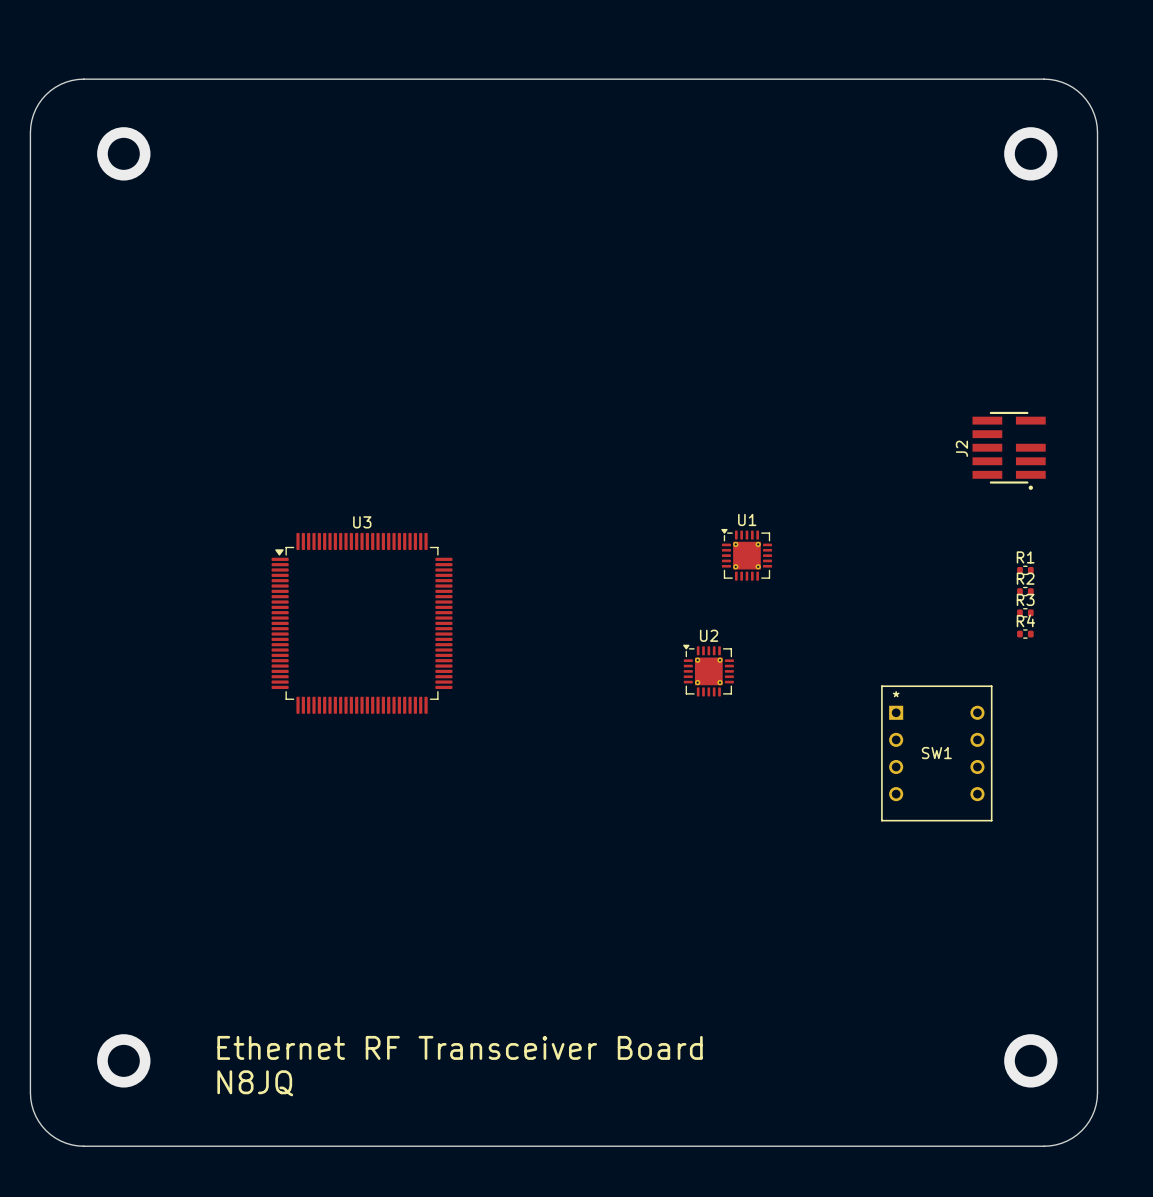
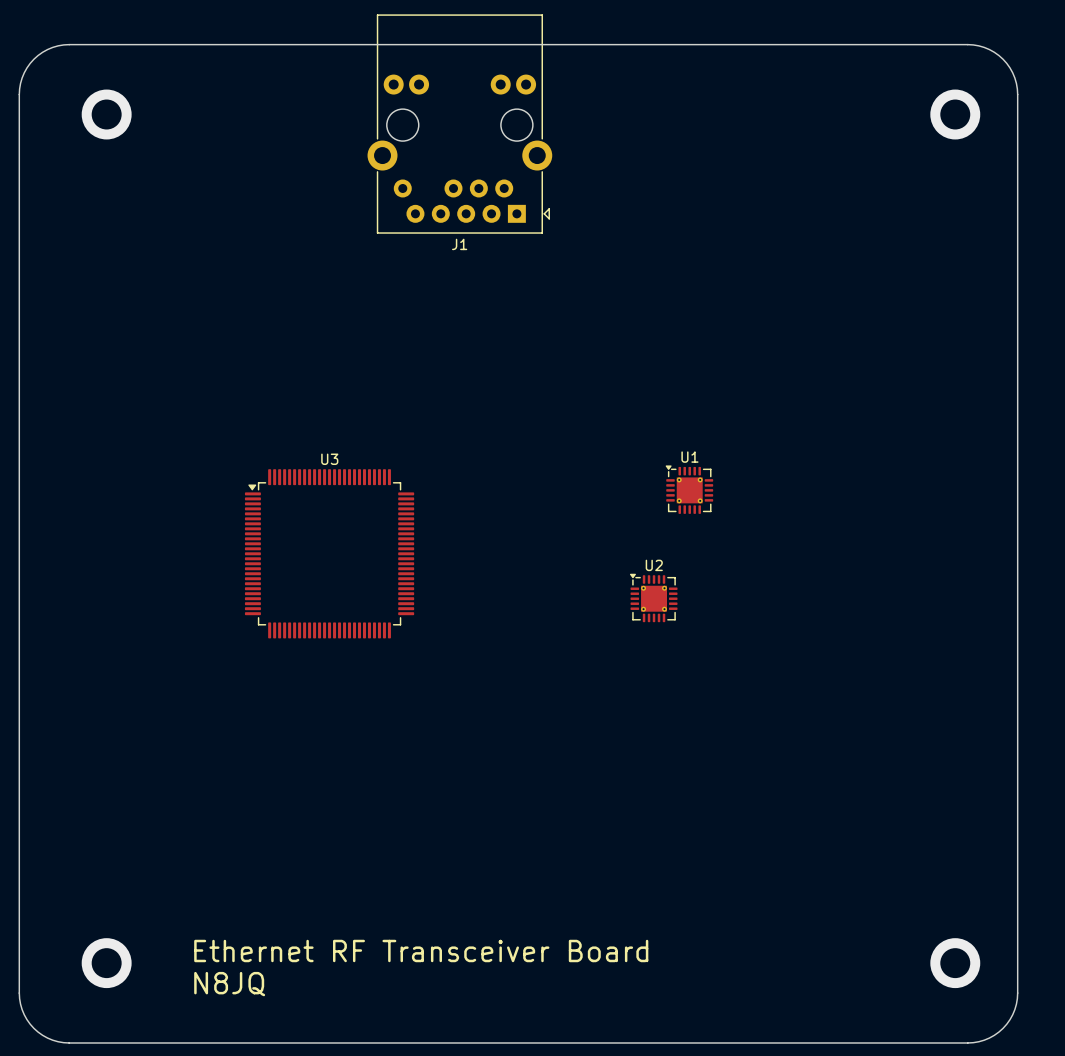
J1: none -> (459, 124)
J2: (1009, 450) -> none
R1: (1025, 570) -> none
R2: (1025, 591) -> none
R3: (1025, 612) -> none
R4: (1025, 634) -> none
SW1: (936, 753) -> none

